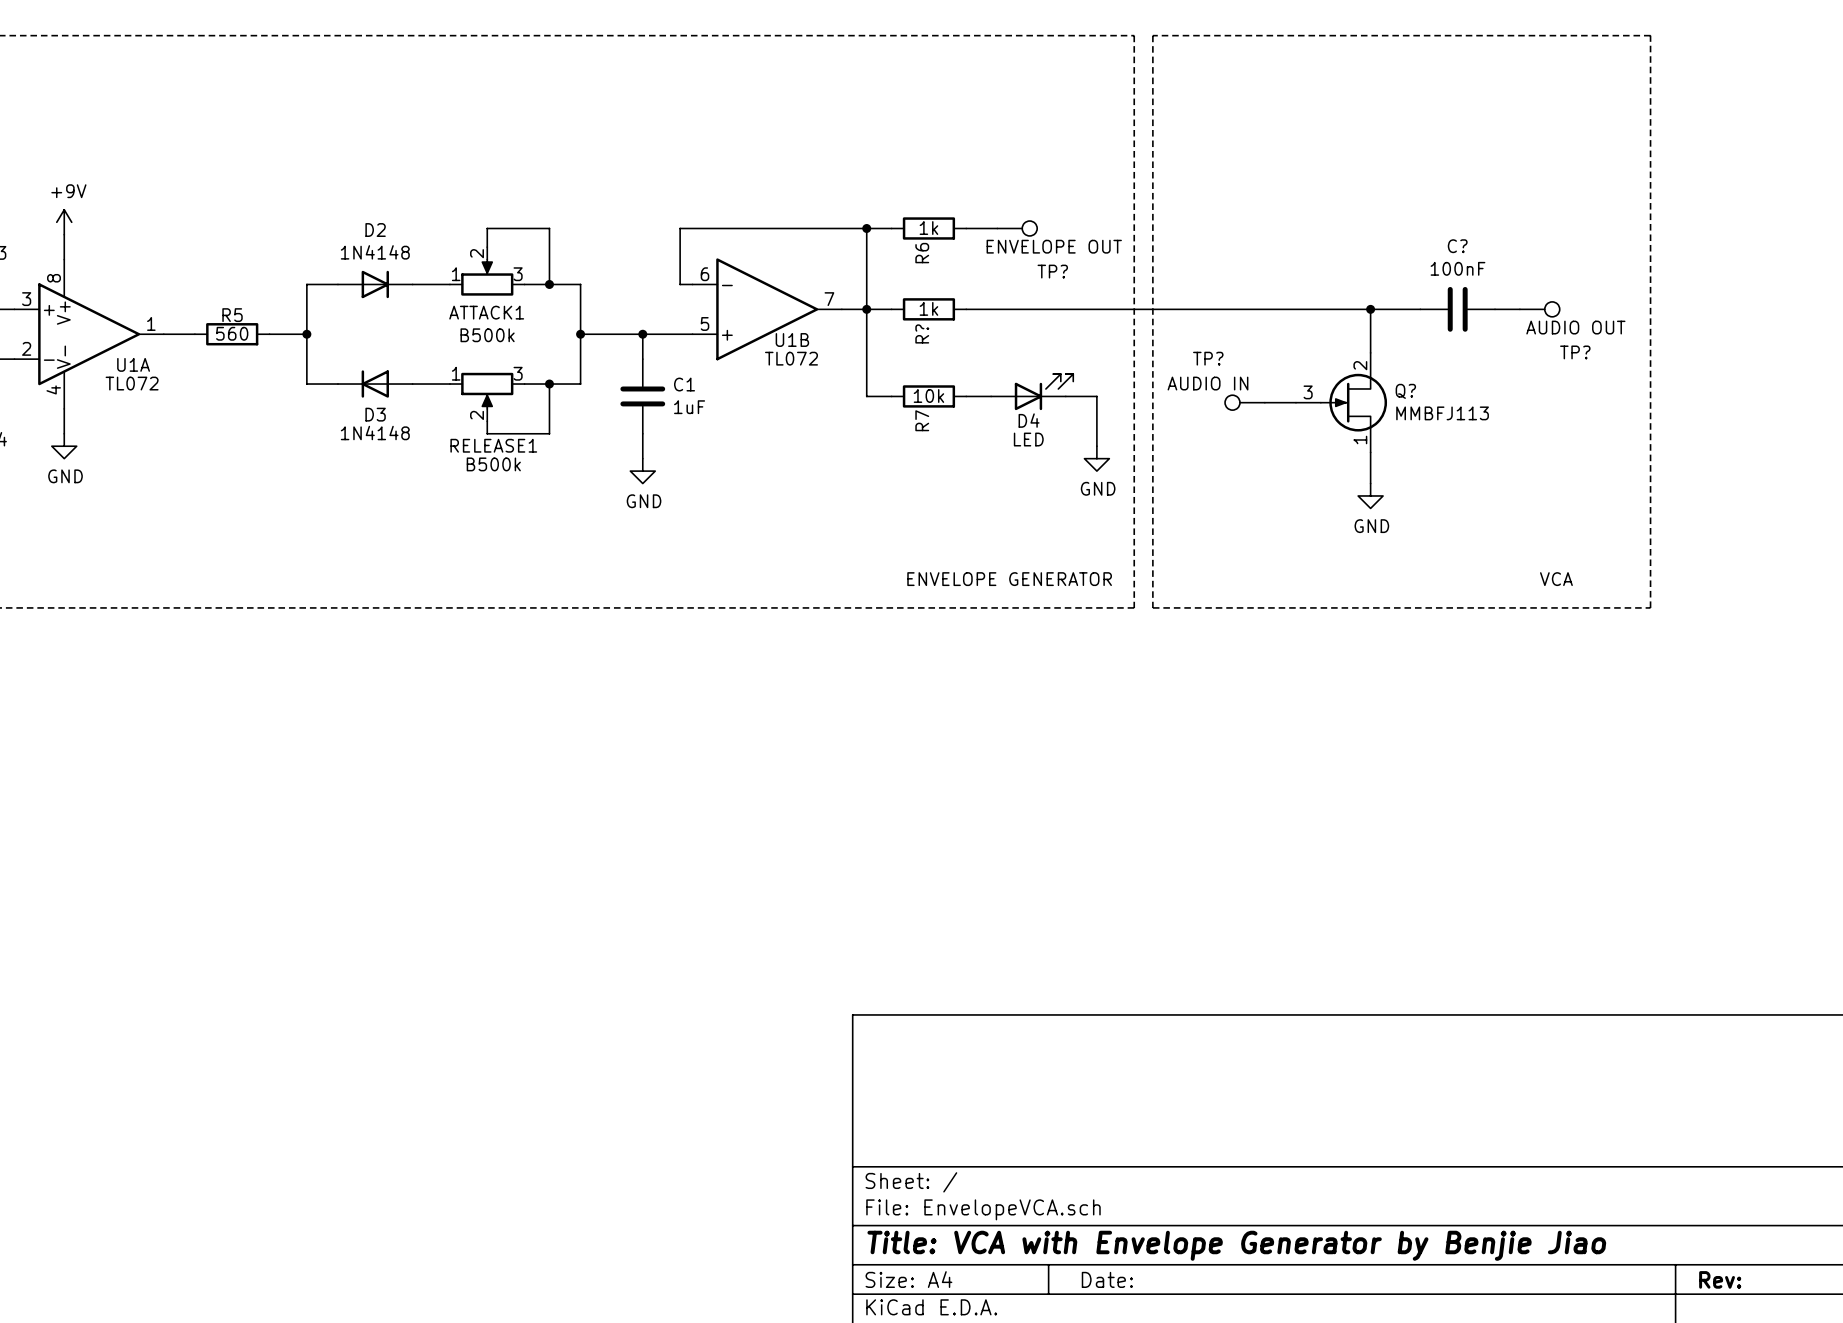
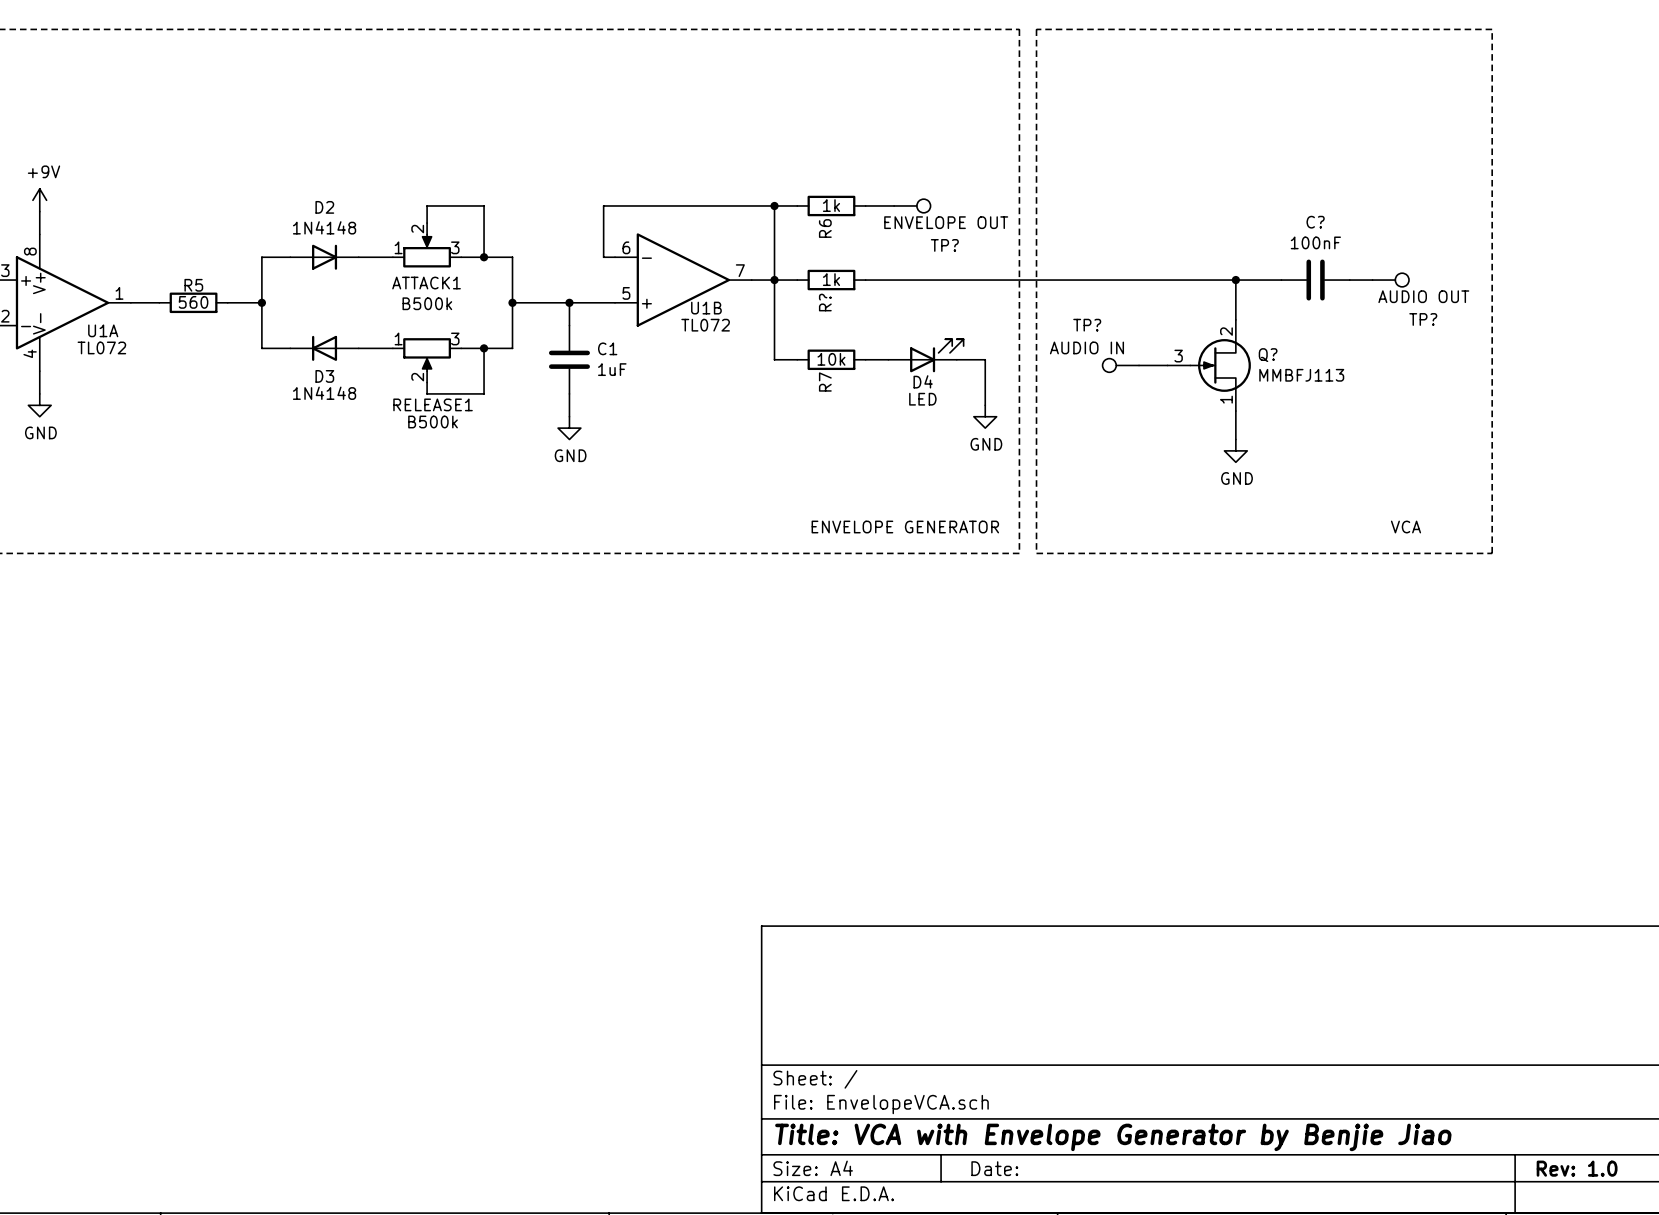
title block: Rev: (1720, 1279) -> Rev: 1.0 (1577, 1168)

